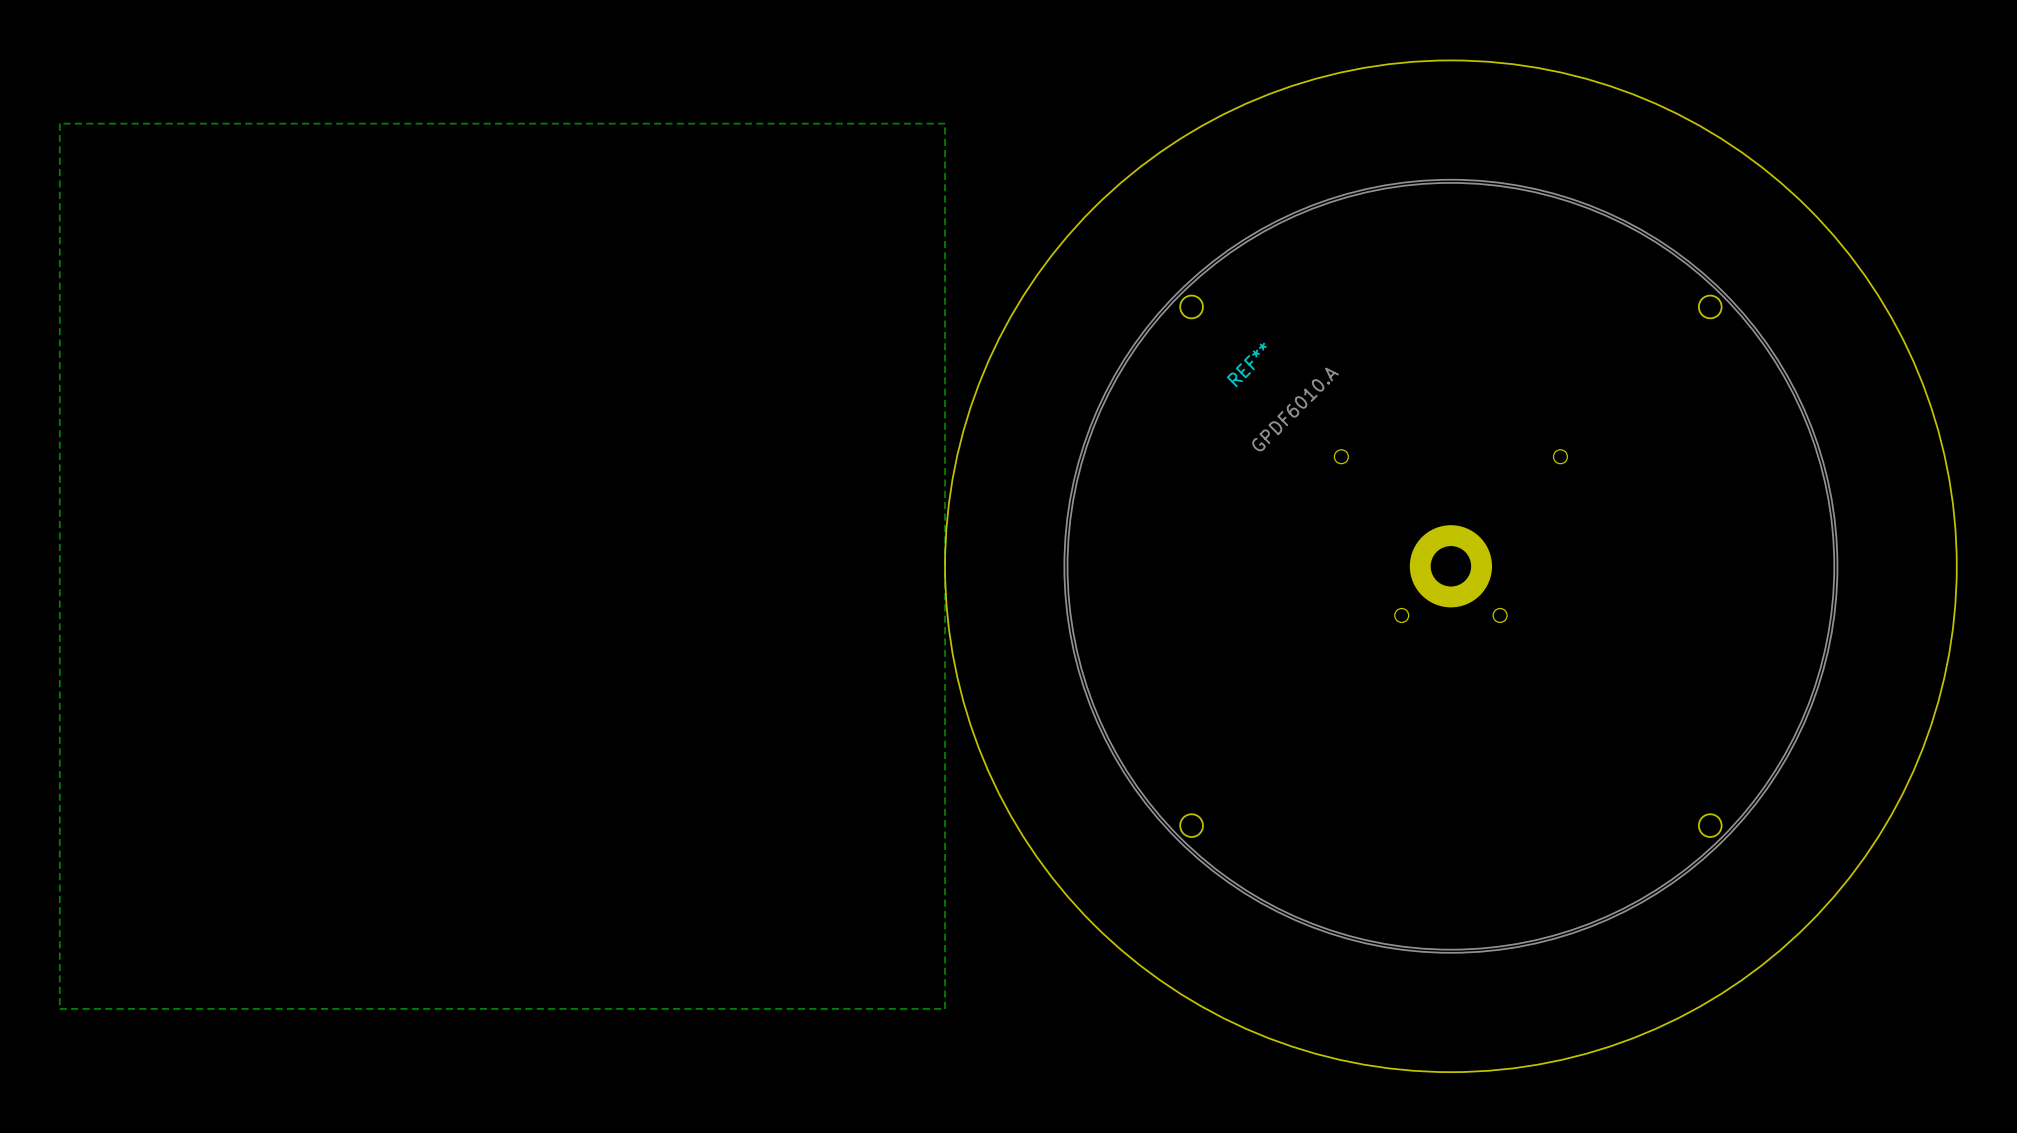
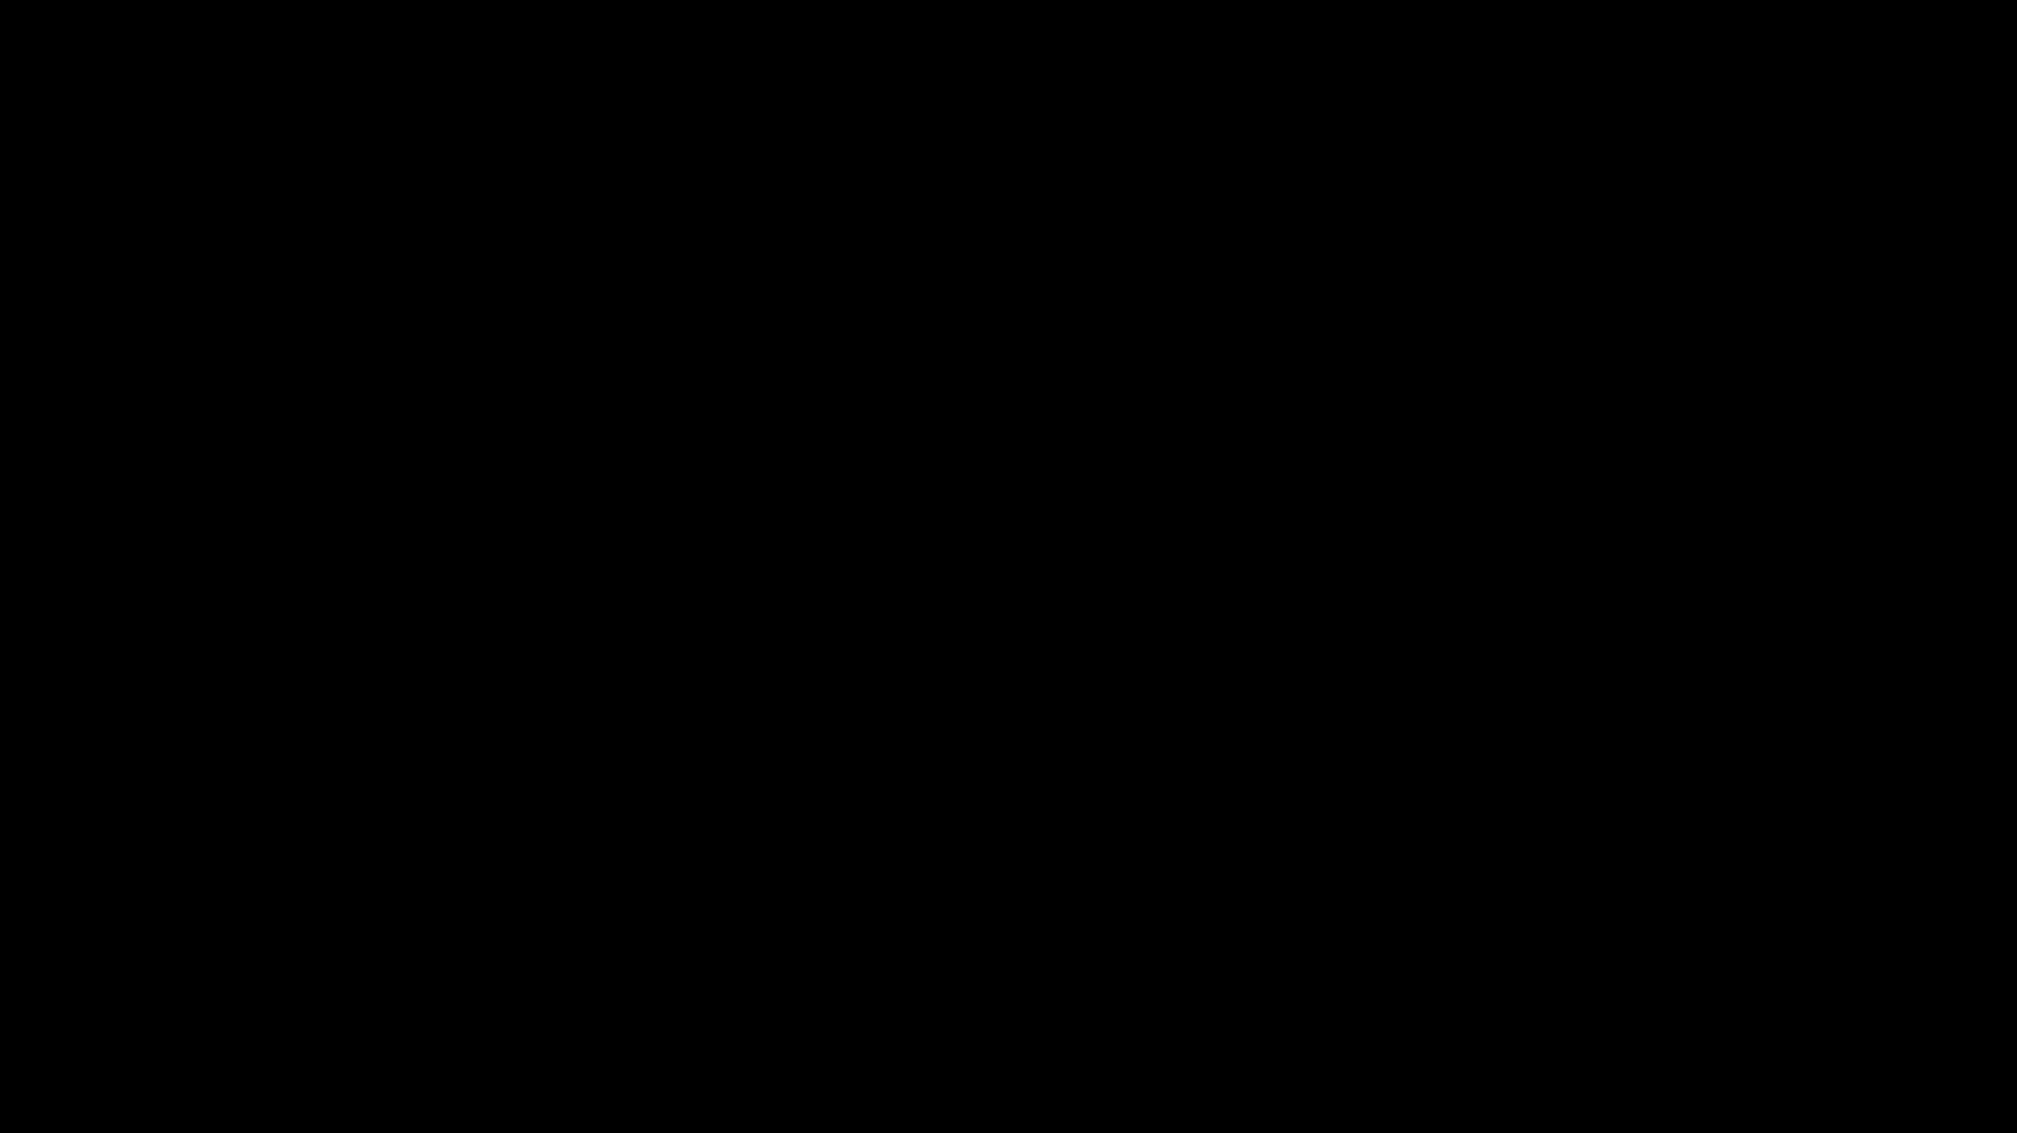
round board edge: [944, 59, 1958, 1073] -> none
zone outline: (945, 123) (59, 123) (59, 1008) (945, 1008) (945, 123) -> none
REF**: GPDF6010.A (1450, 566) -> none

